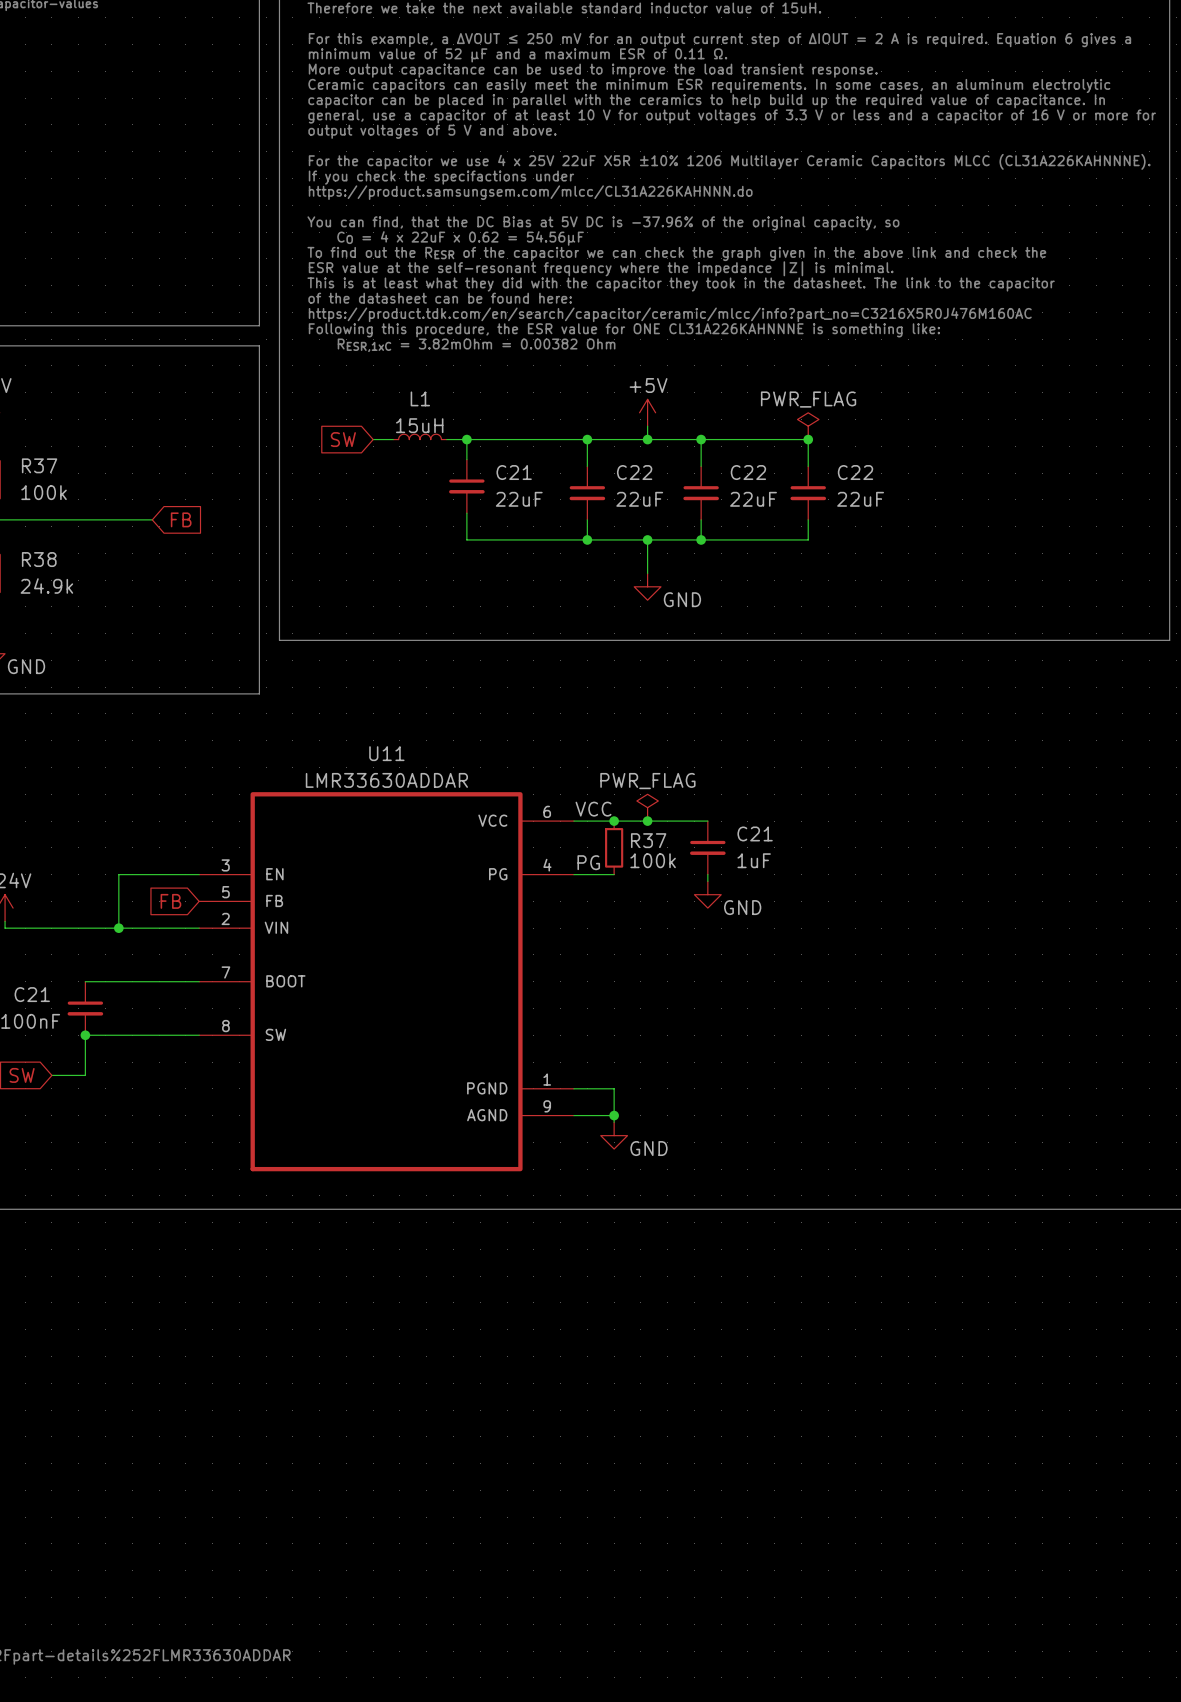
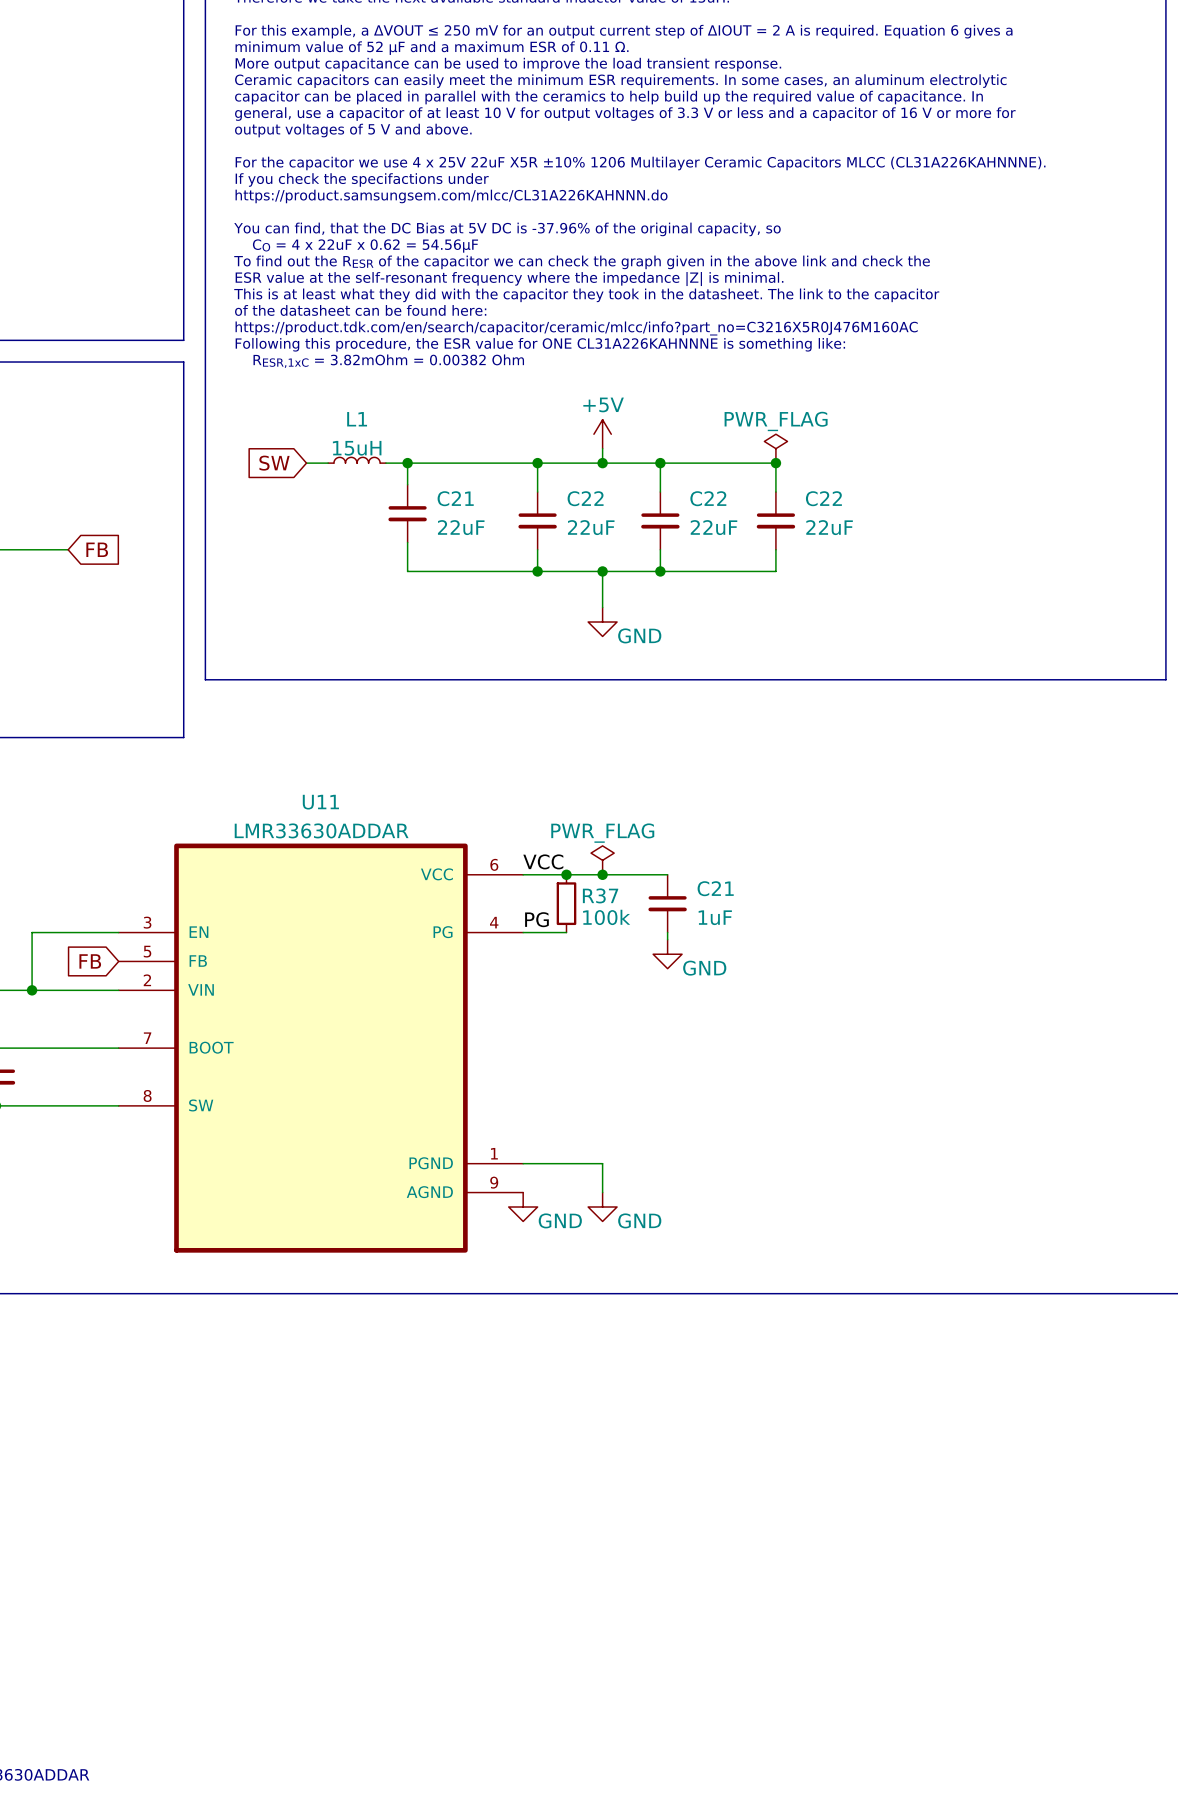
wire: (614, 1088) (614, 1122) -> (566, 1163) (602, 1163) (602, 1192)
wire: (573, 1115) (614, 1115) -> none
junction: (614, 1115) -> none
power symbol: none -> GND (523, 1207)
power symbol: none -> GND (602, 1207)
power symbol: GND (614, 1135) -> none

